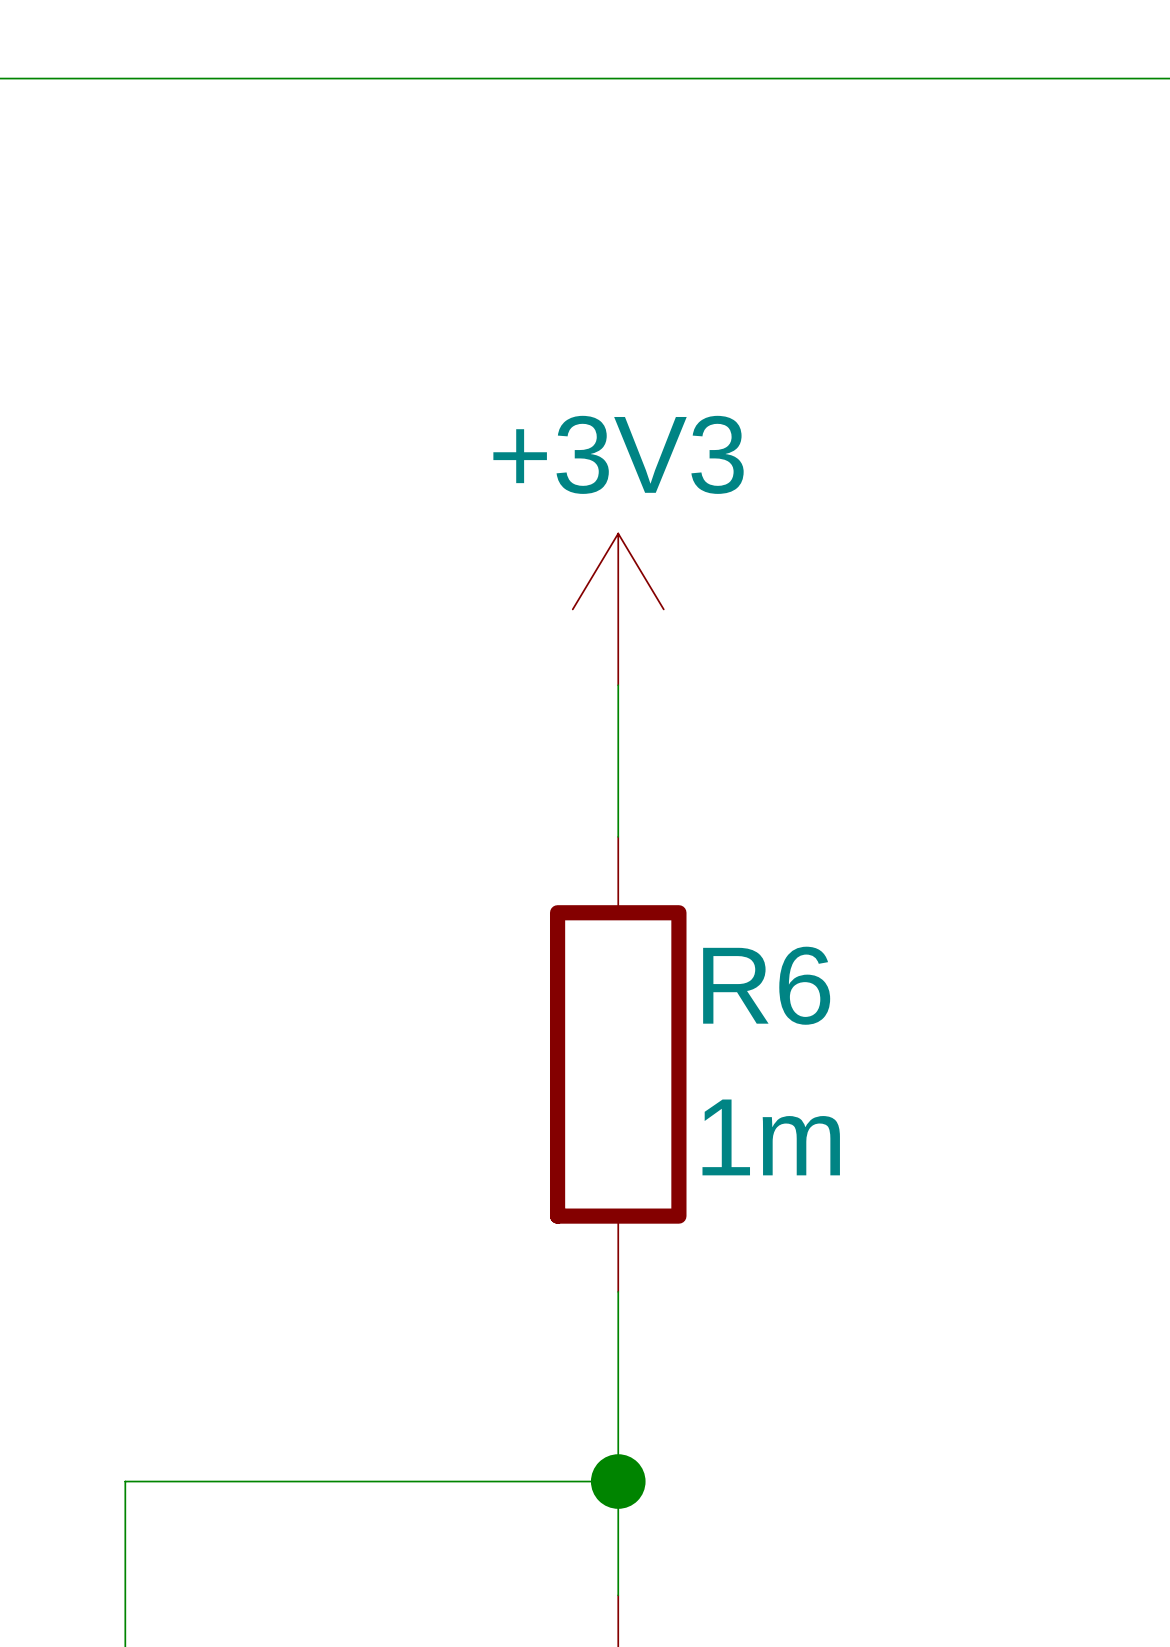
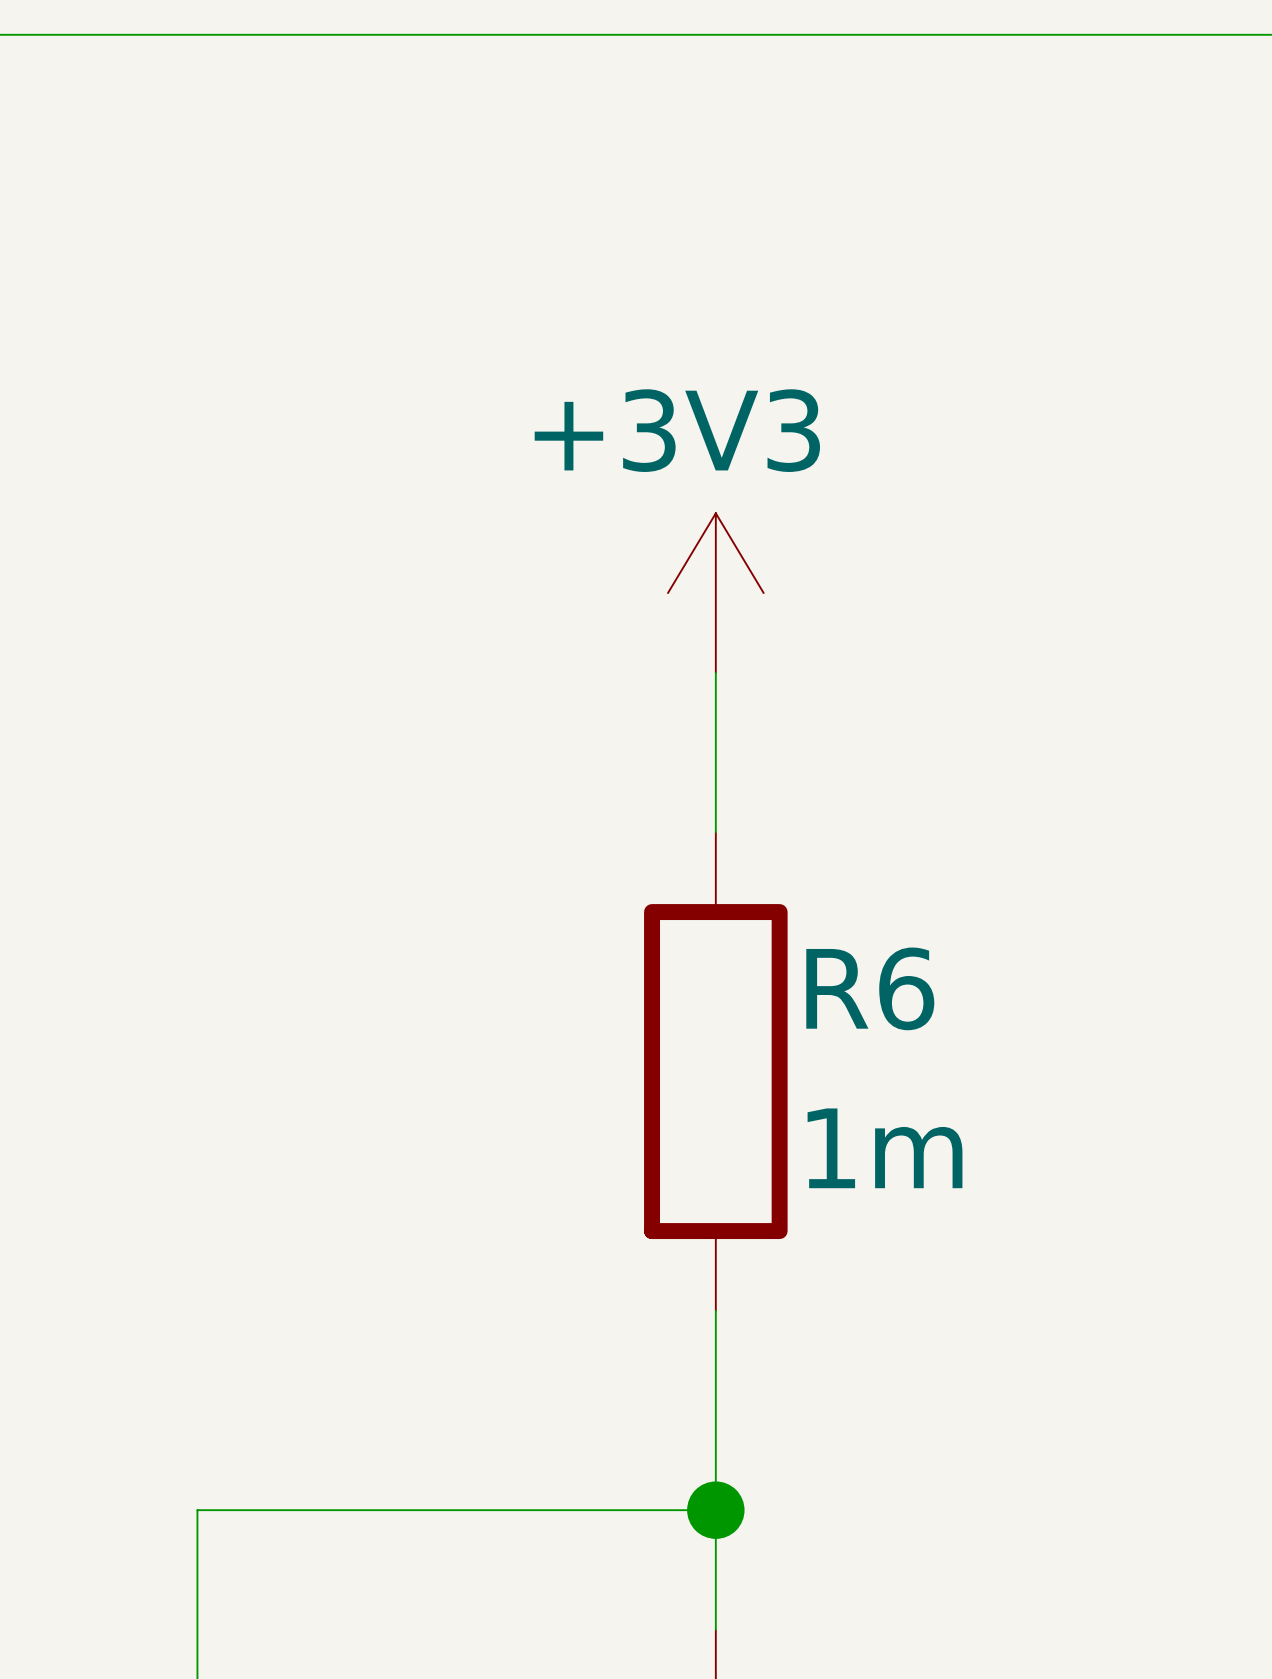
power symbol text position: +3V3 (618, 454) -> +3V3 (677, 430)

